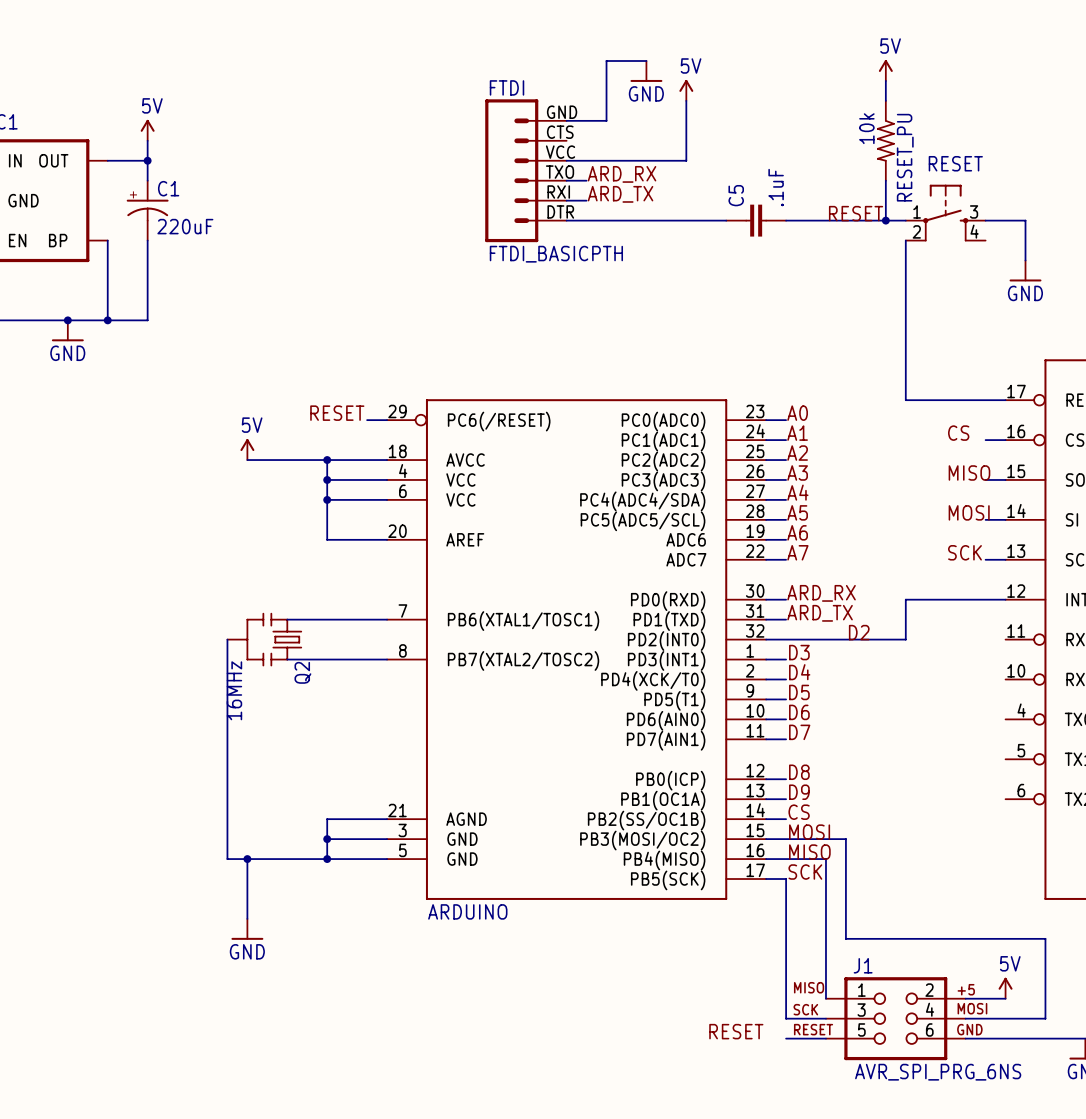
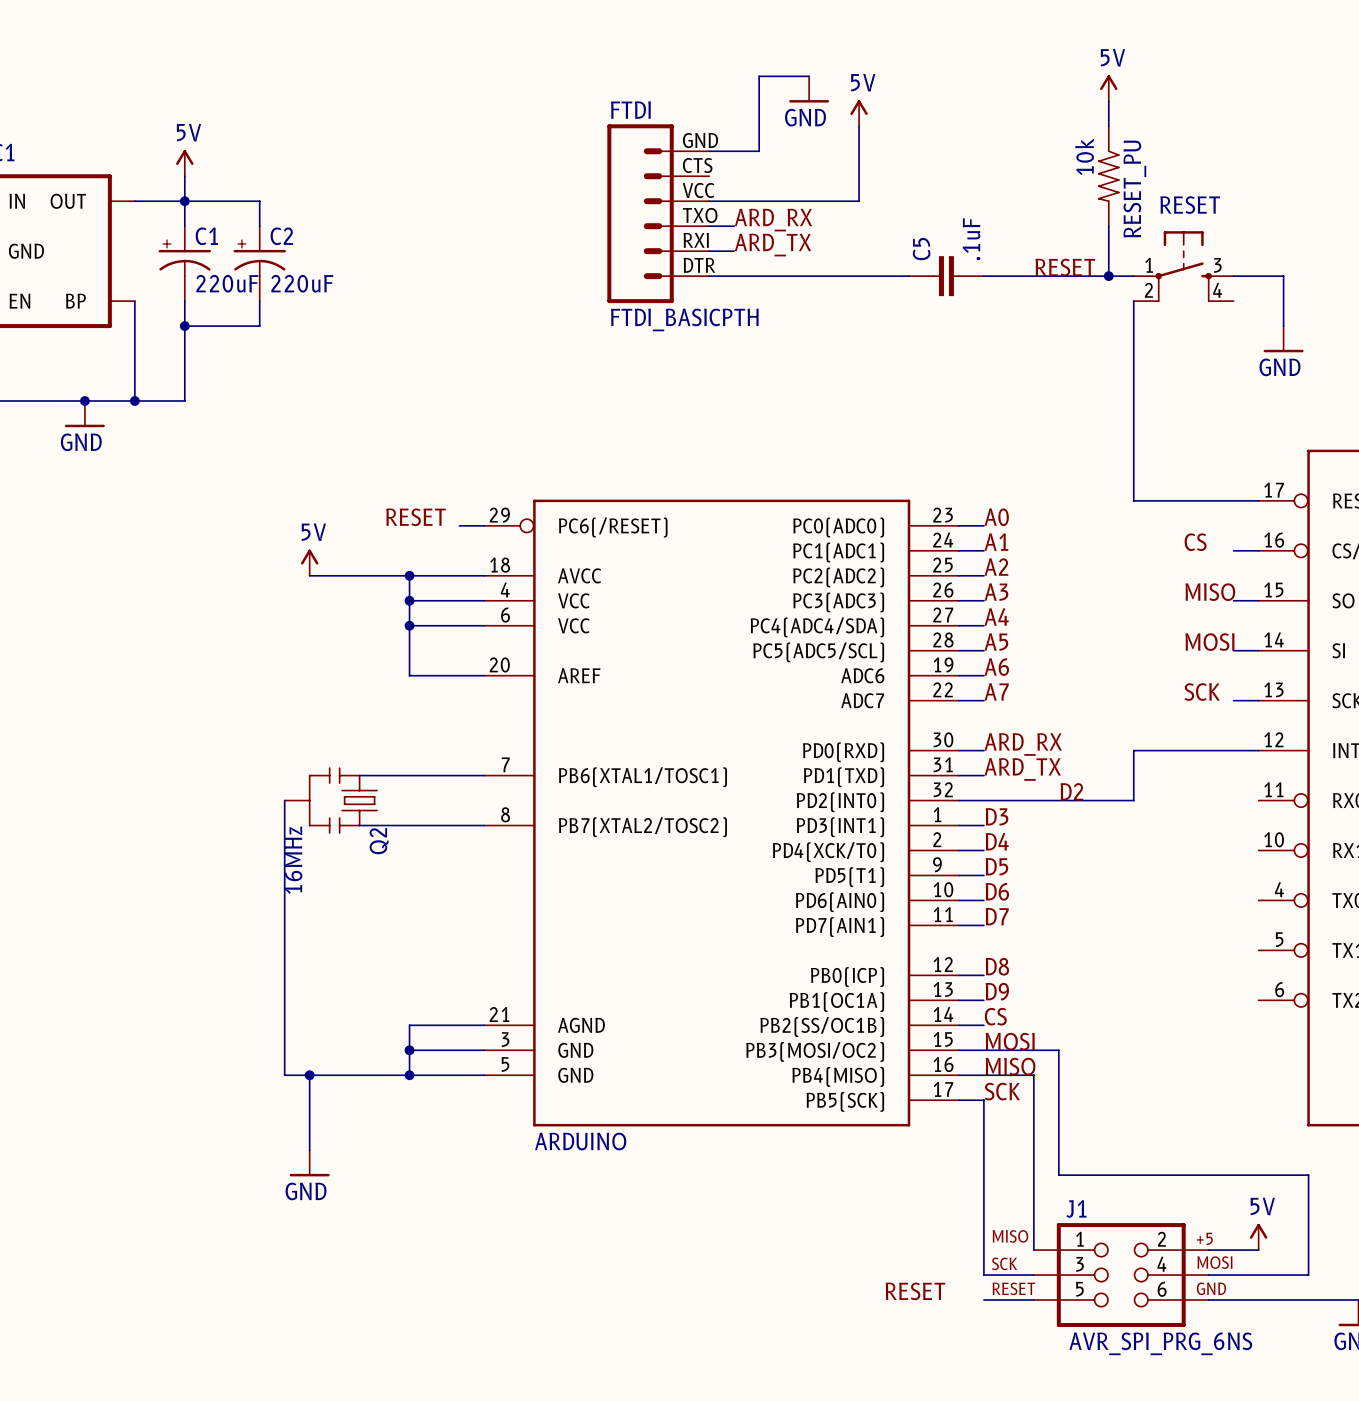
wire: none -> (184, 201) (259, 201) (259, 226)
C2: none -> 220uF (259, 263)
wire: none -> (259, 301) (259, 326) (184, 326)
junction: none -> (184, 326)

